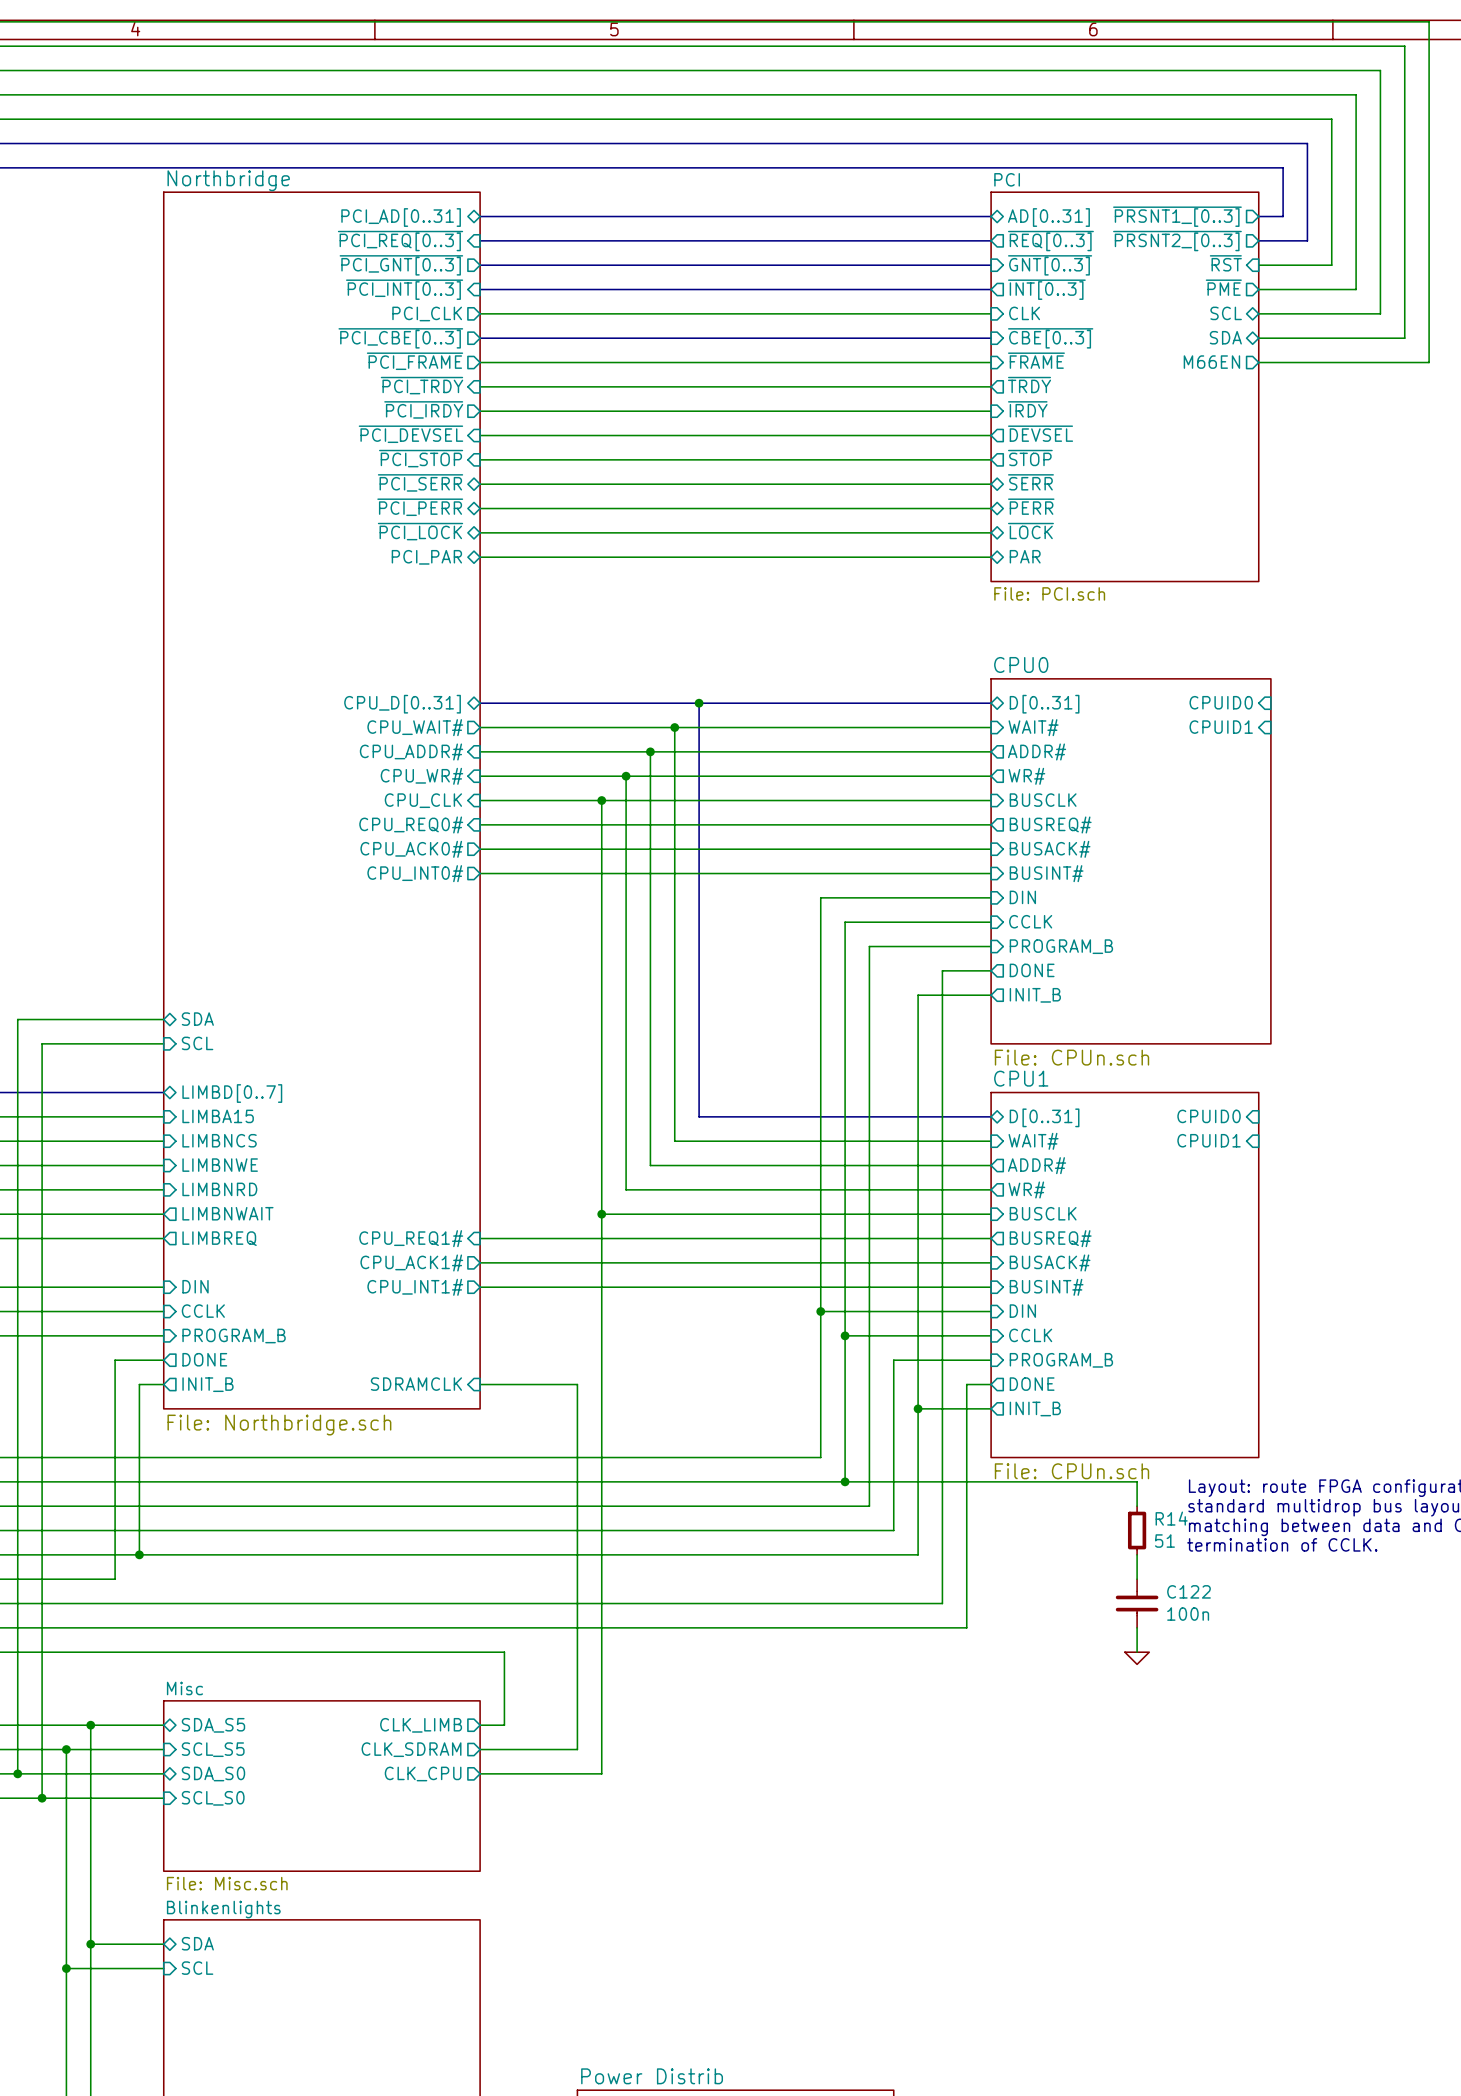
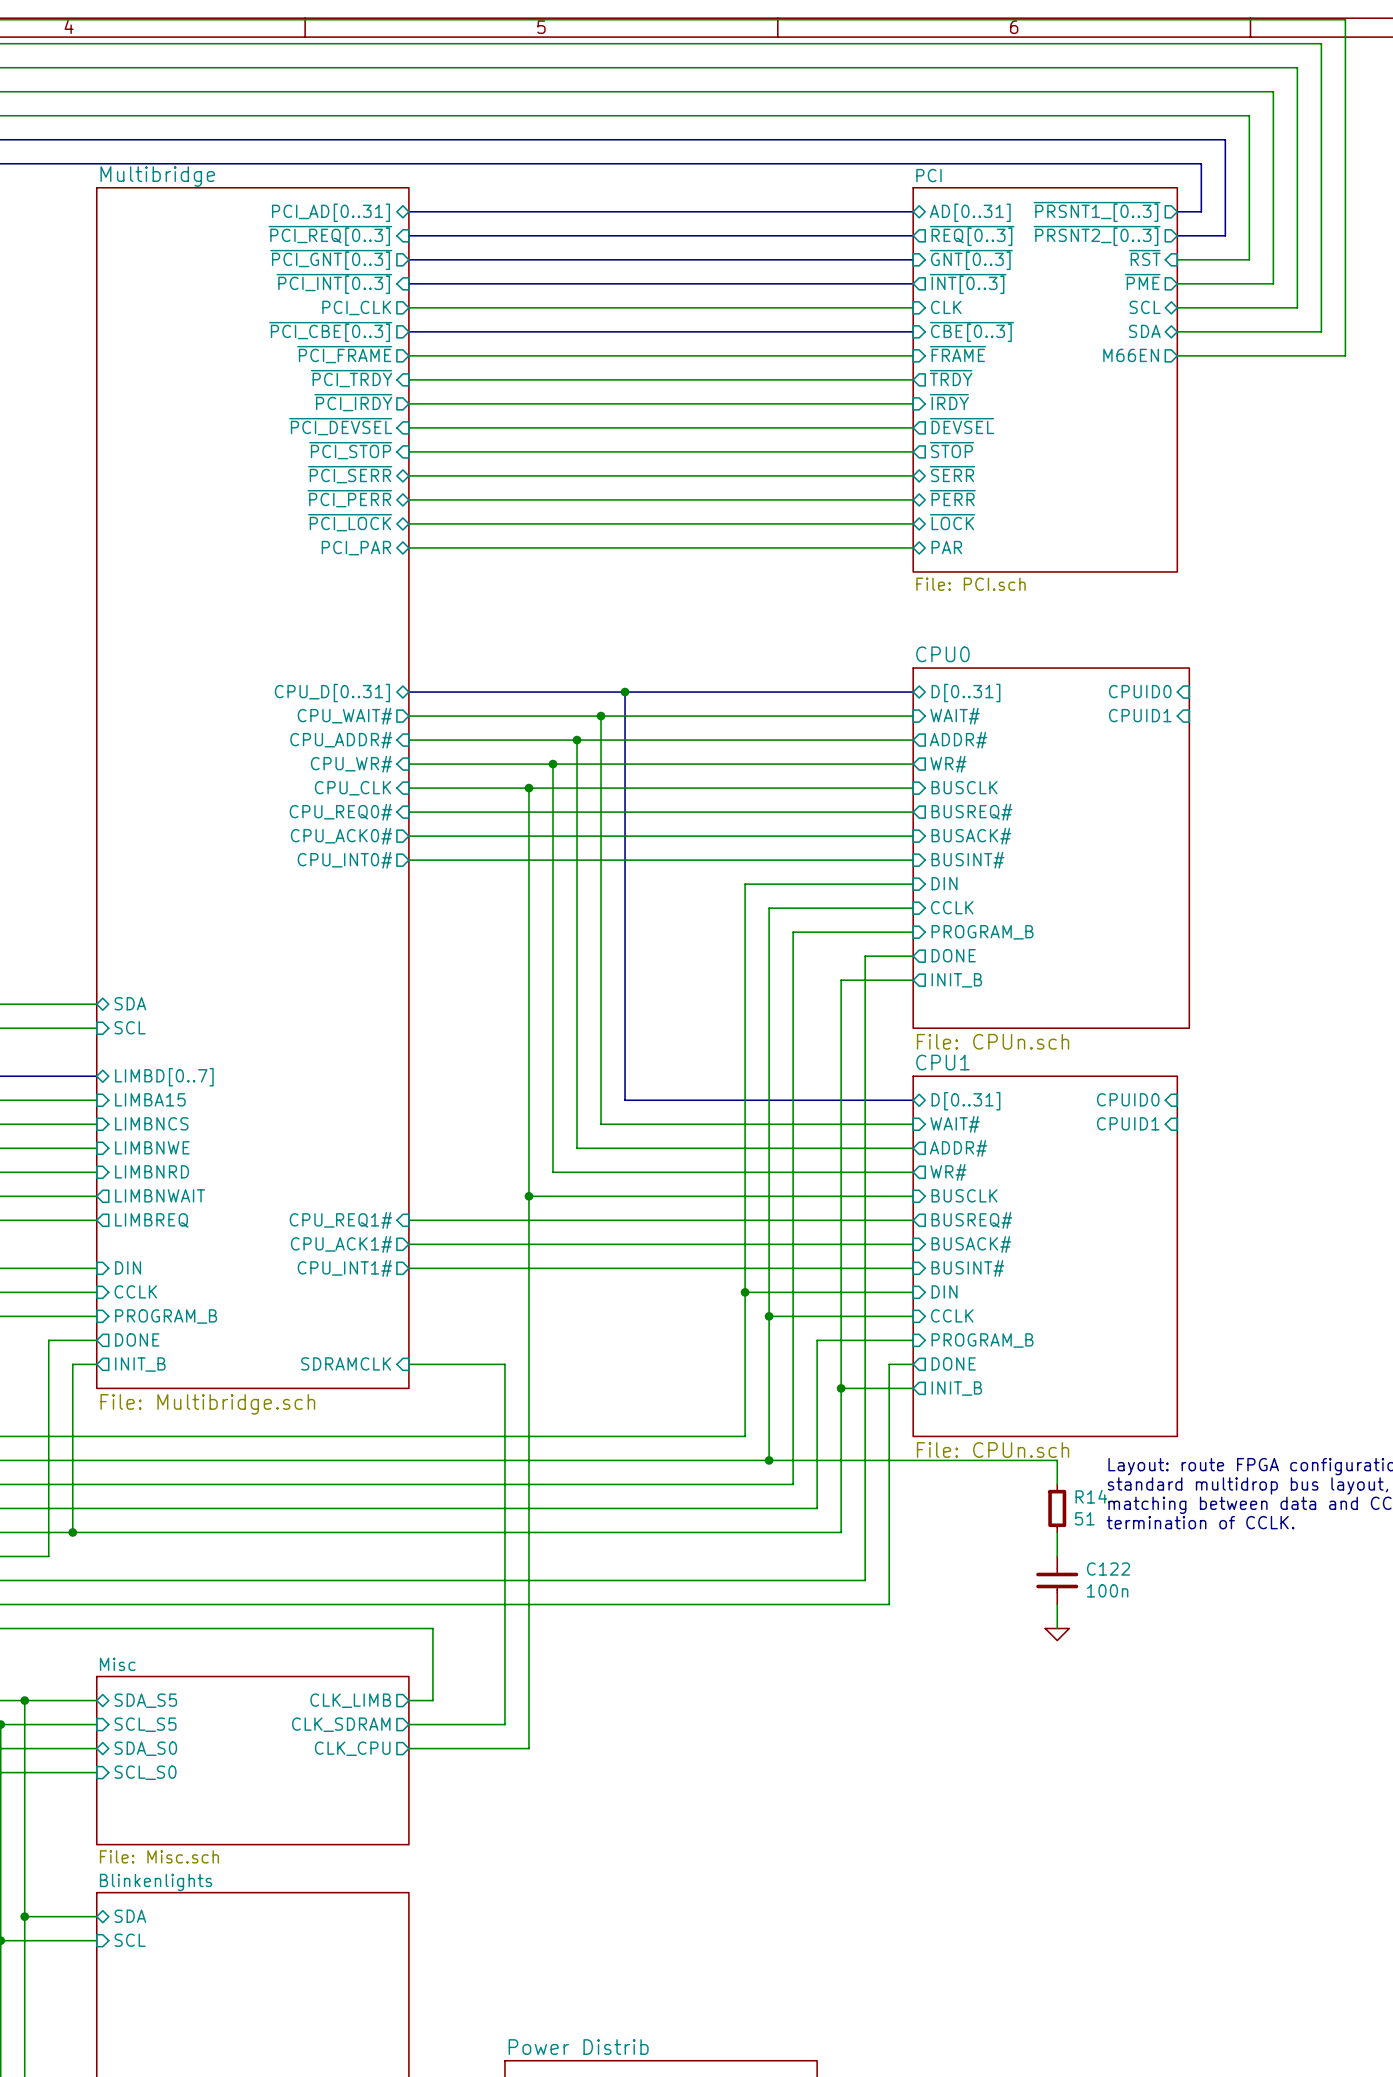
sheet Northbridge name: Northbridge (228, 180) -> Multibridge (157, 176)
sheet Northbridge value: File: Northbridge.sch (279, 1425) -> File: Multibridge.sch (207, 1404)

